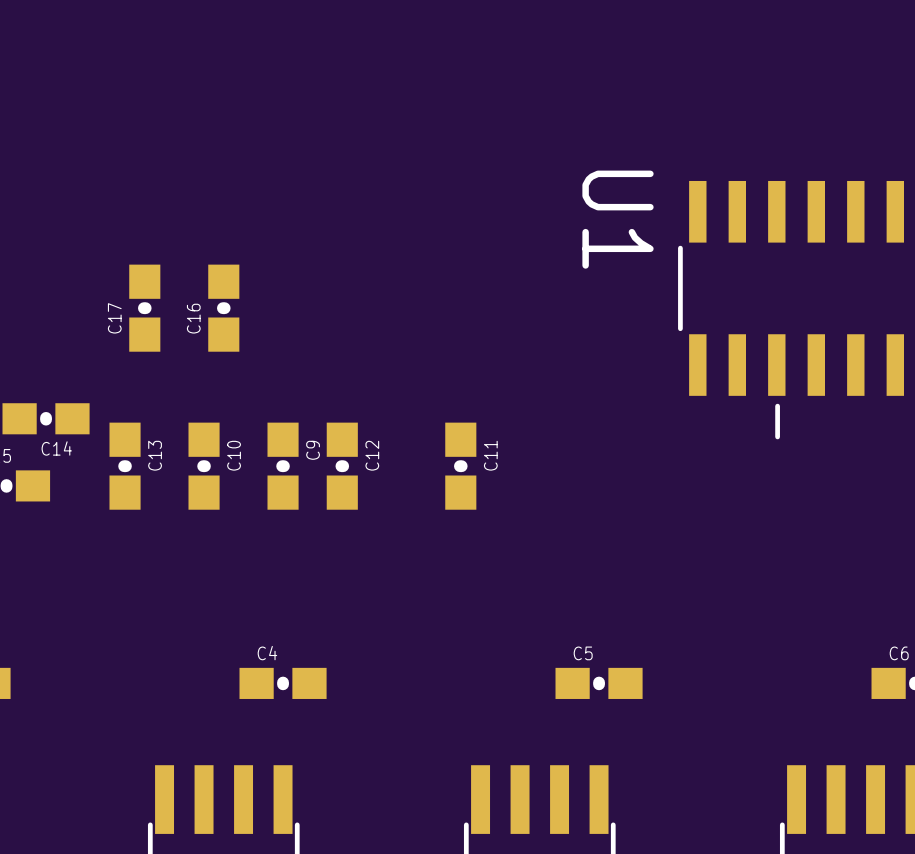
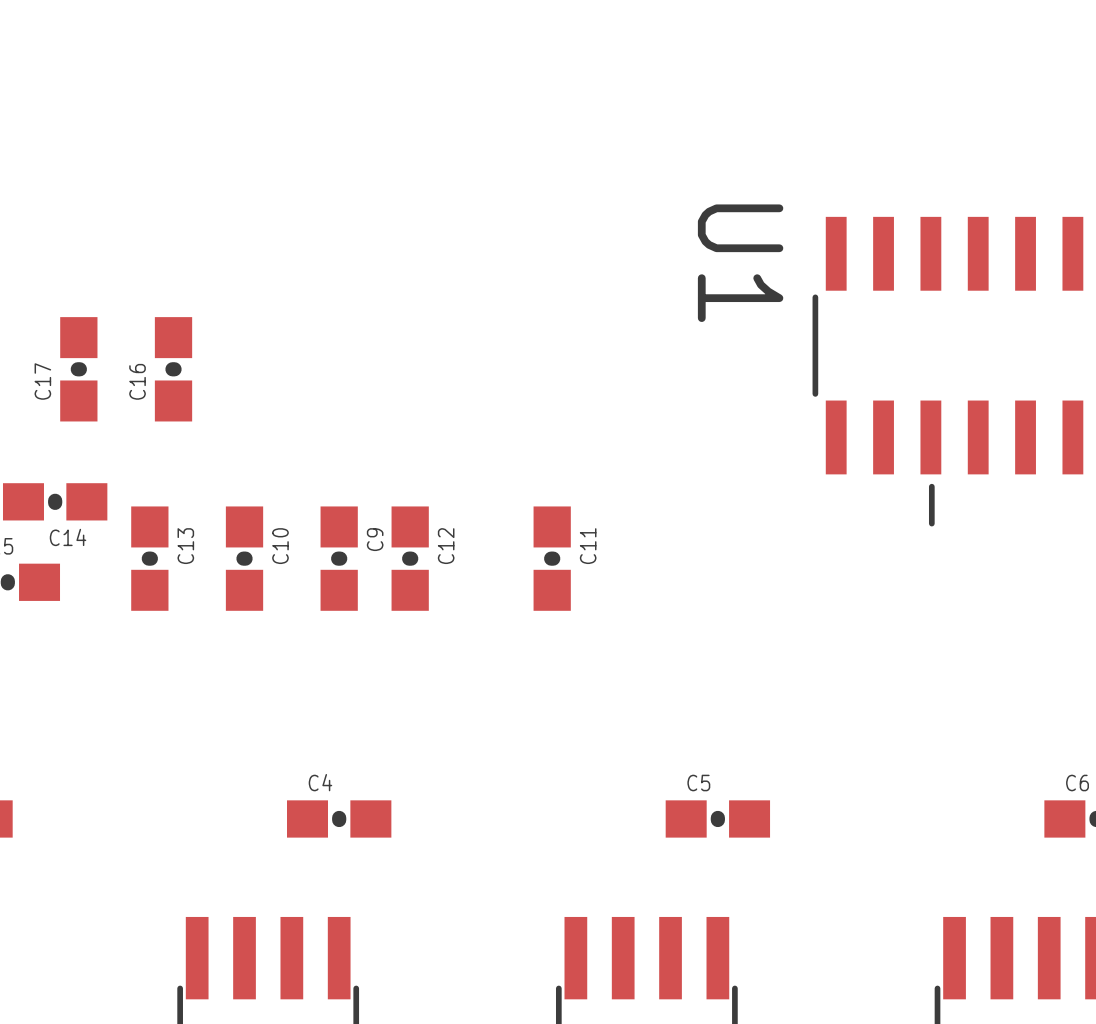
C17: none -> (78, 369)
C16: (223, 308) -> none
C17 name: C17 (114, 318) -> C16 (137, 381)

